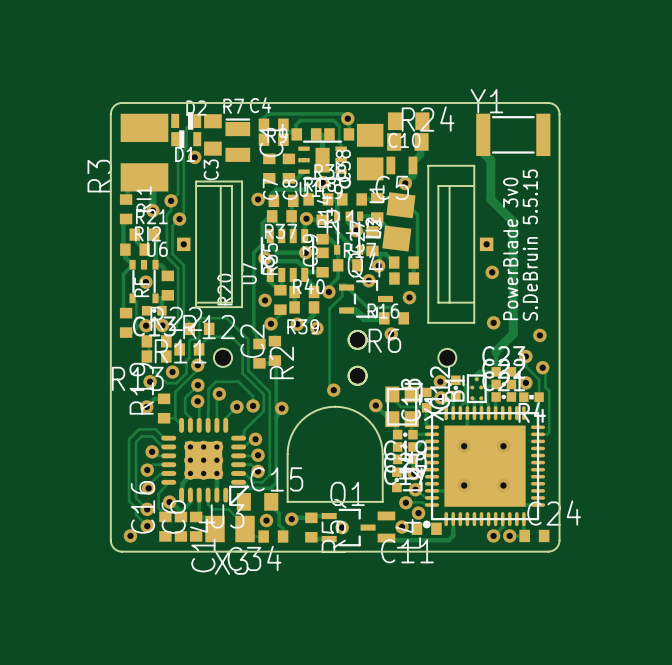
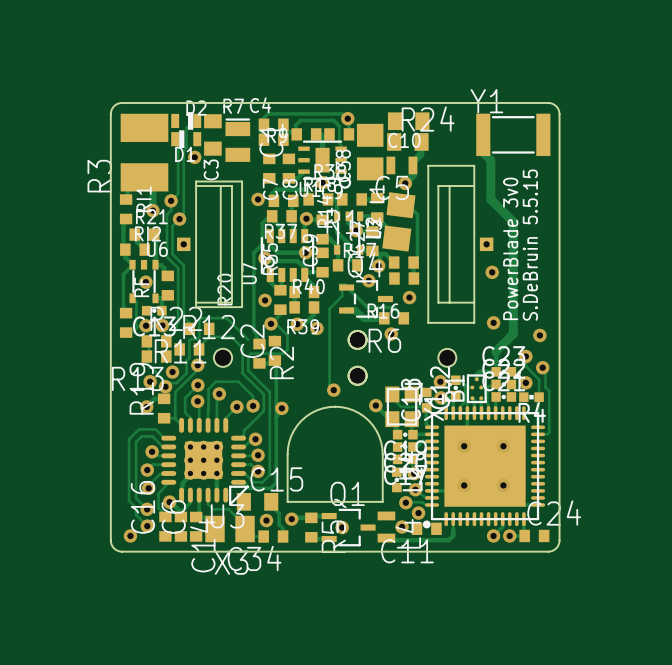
track: (338, 265) (338, 277) (329, 286) (328, 291) -> none
via: (328, 291) -> none
track: (248, 339) (248, 356) -> (271, 323) (276, 324) (287, 335) (287, 349) (283, 353) (251, 353) (248, 356)
via: none -> (165, 386)

